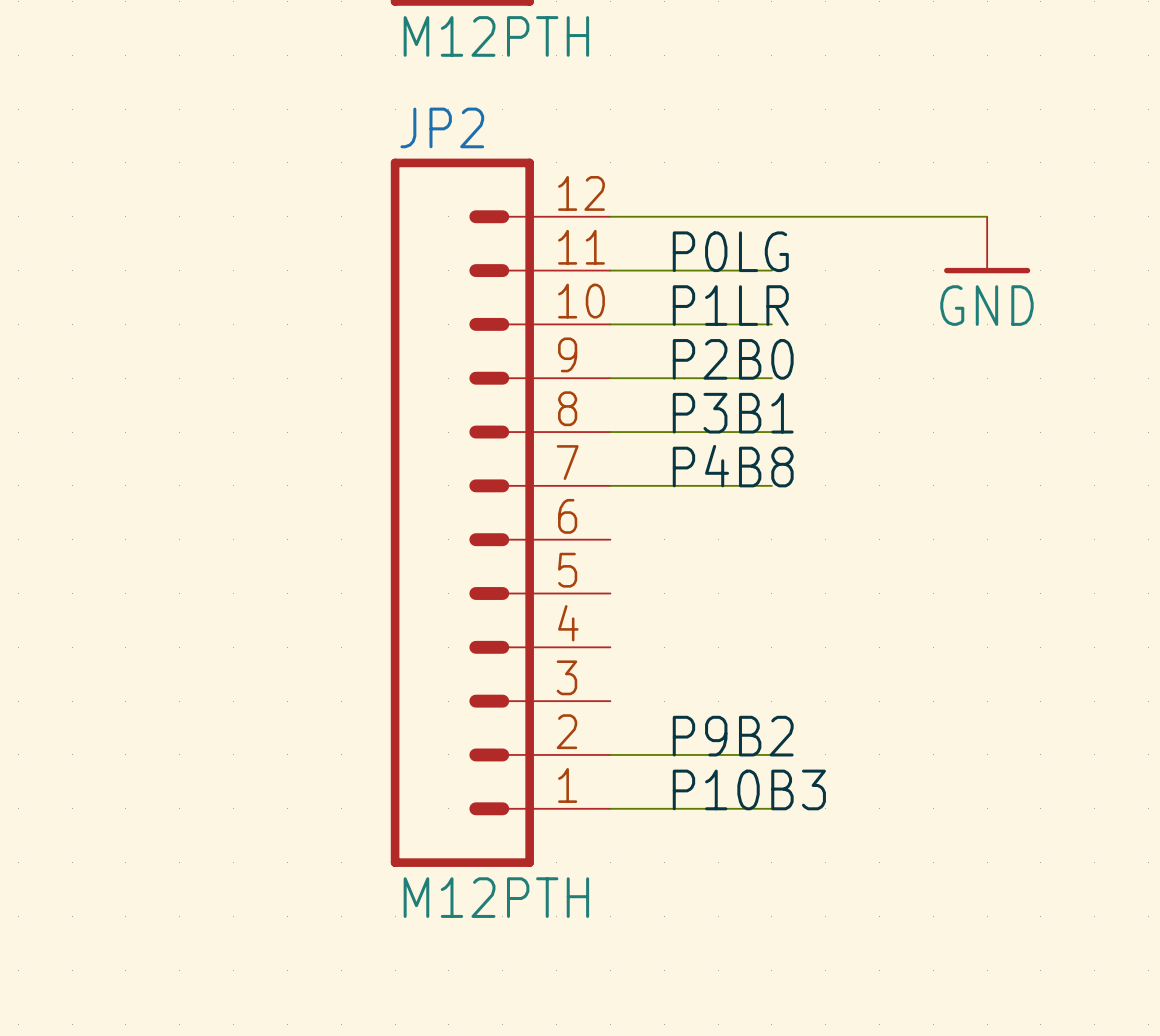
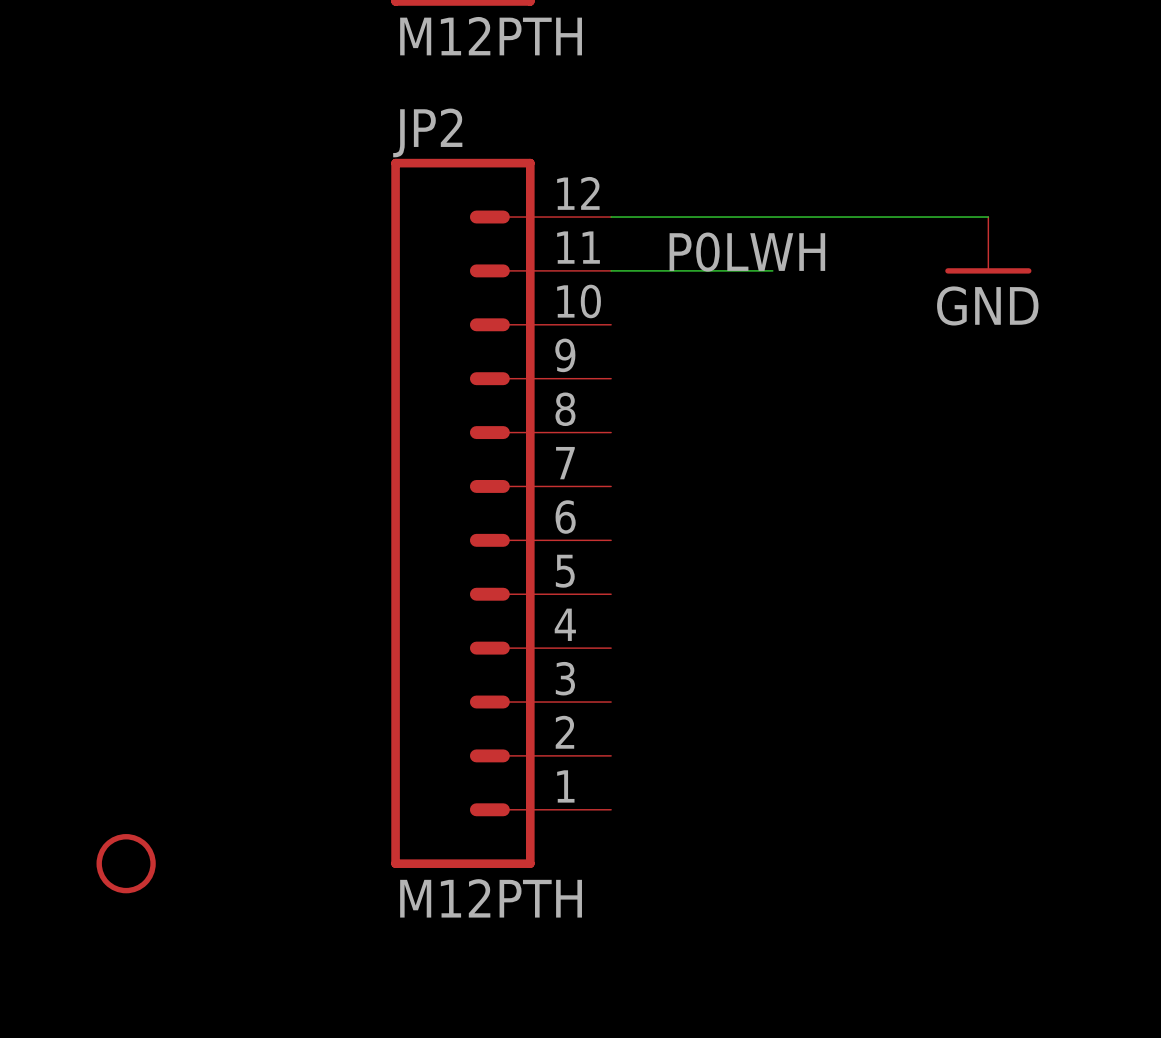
label: P0LG (730, 251) -> P0LWH (747, 252)
label: P1LR (730, 305) -> none
wire: (610, 324) (771, 324) -> none
label: P2B0 (733, 359) -> none
wire: (610, 378) (771, 378) -> none
label: P3B1 (733, 413) -> none
wire: (610, 432) (771, 432) -> none
label: P4B8 (733, 466) -> none
wire: (610, 485) (771, 485) -> none
label: P9B2 (733, 736) -> none
wire: (610, 754) (771, 754) -> none
label: P10B3 (749, 789) -> none
wire: (610, 808) (771, 808) -> none
part: none -> (126, 863)

